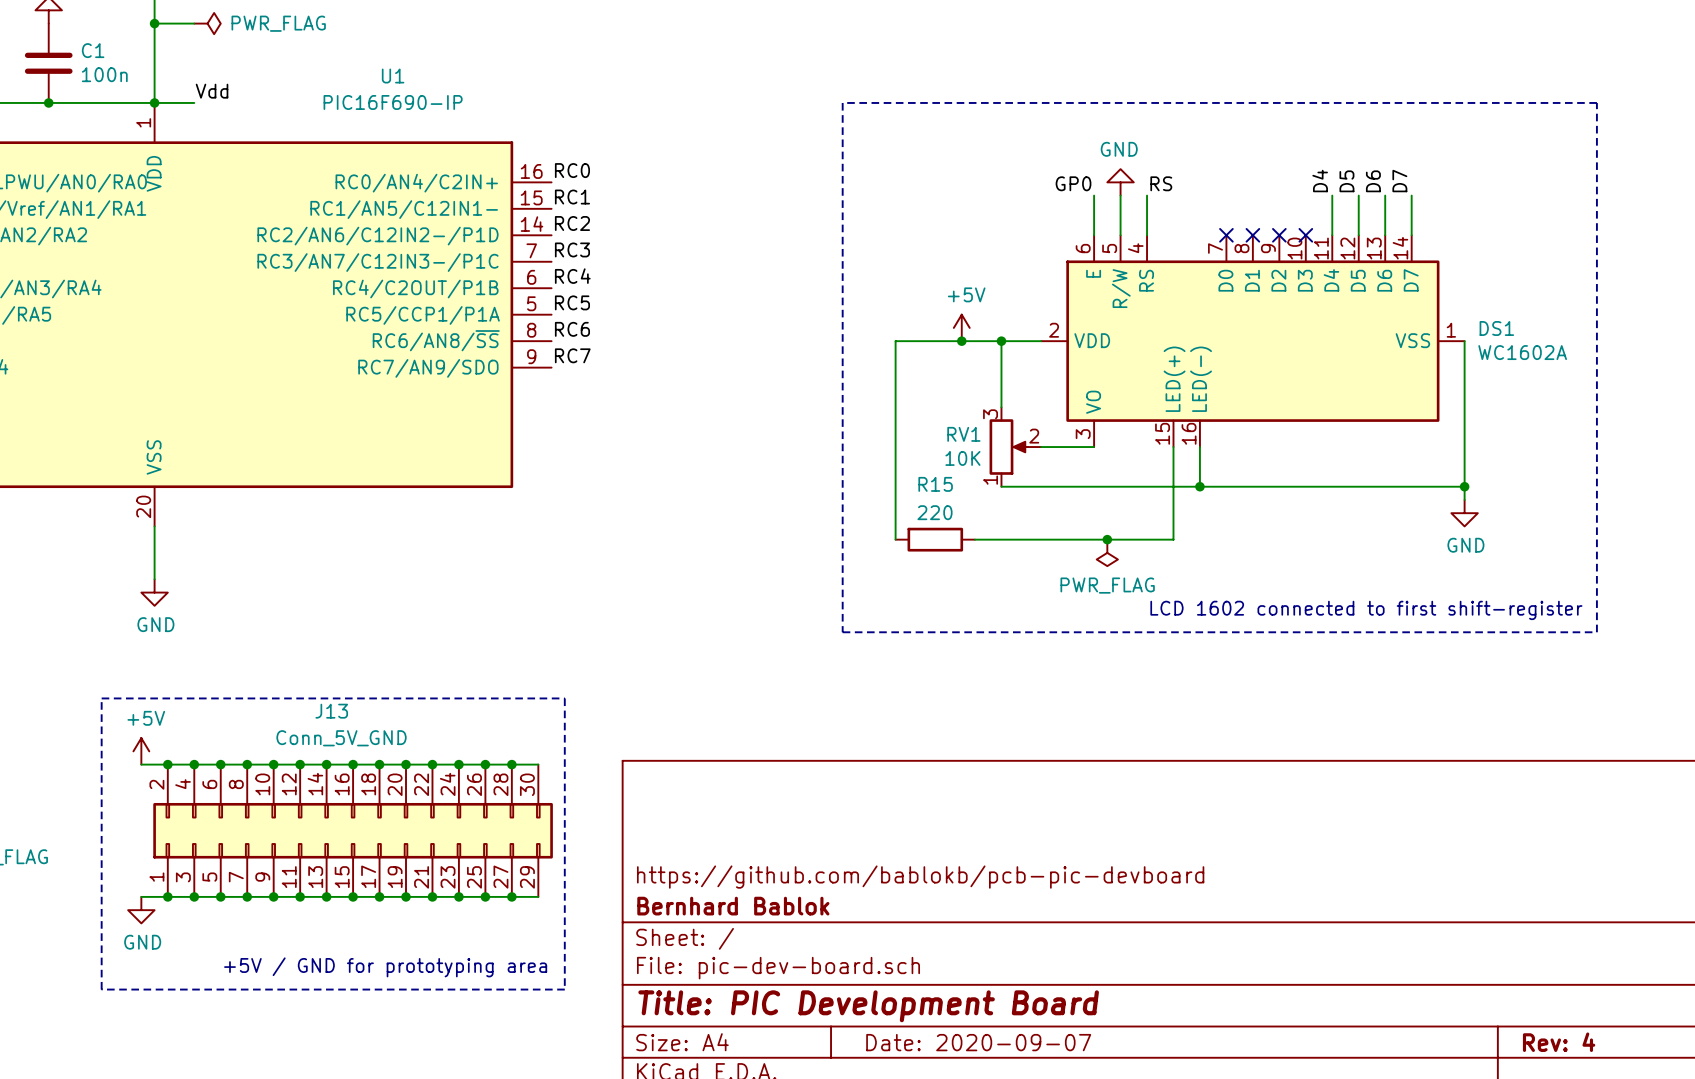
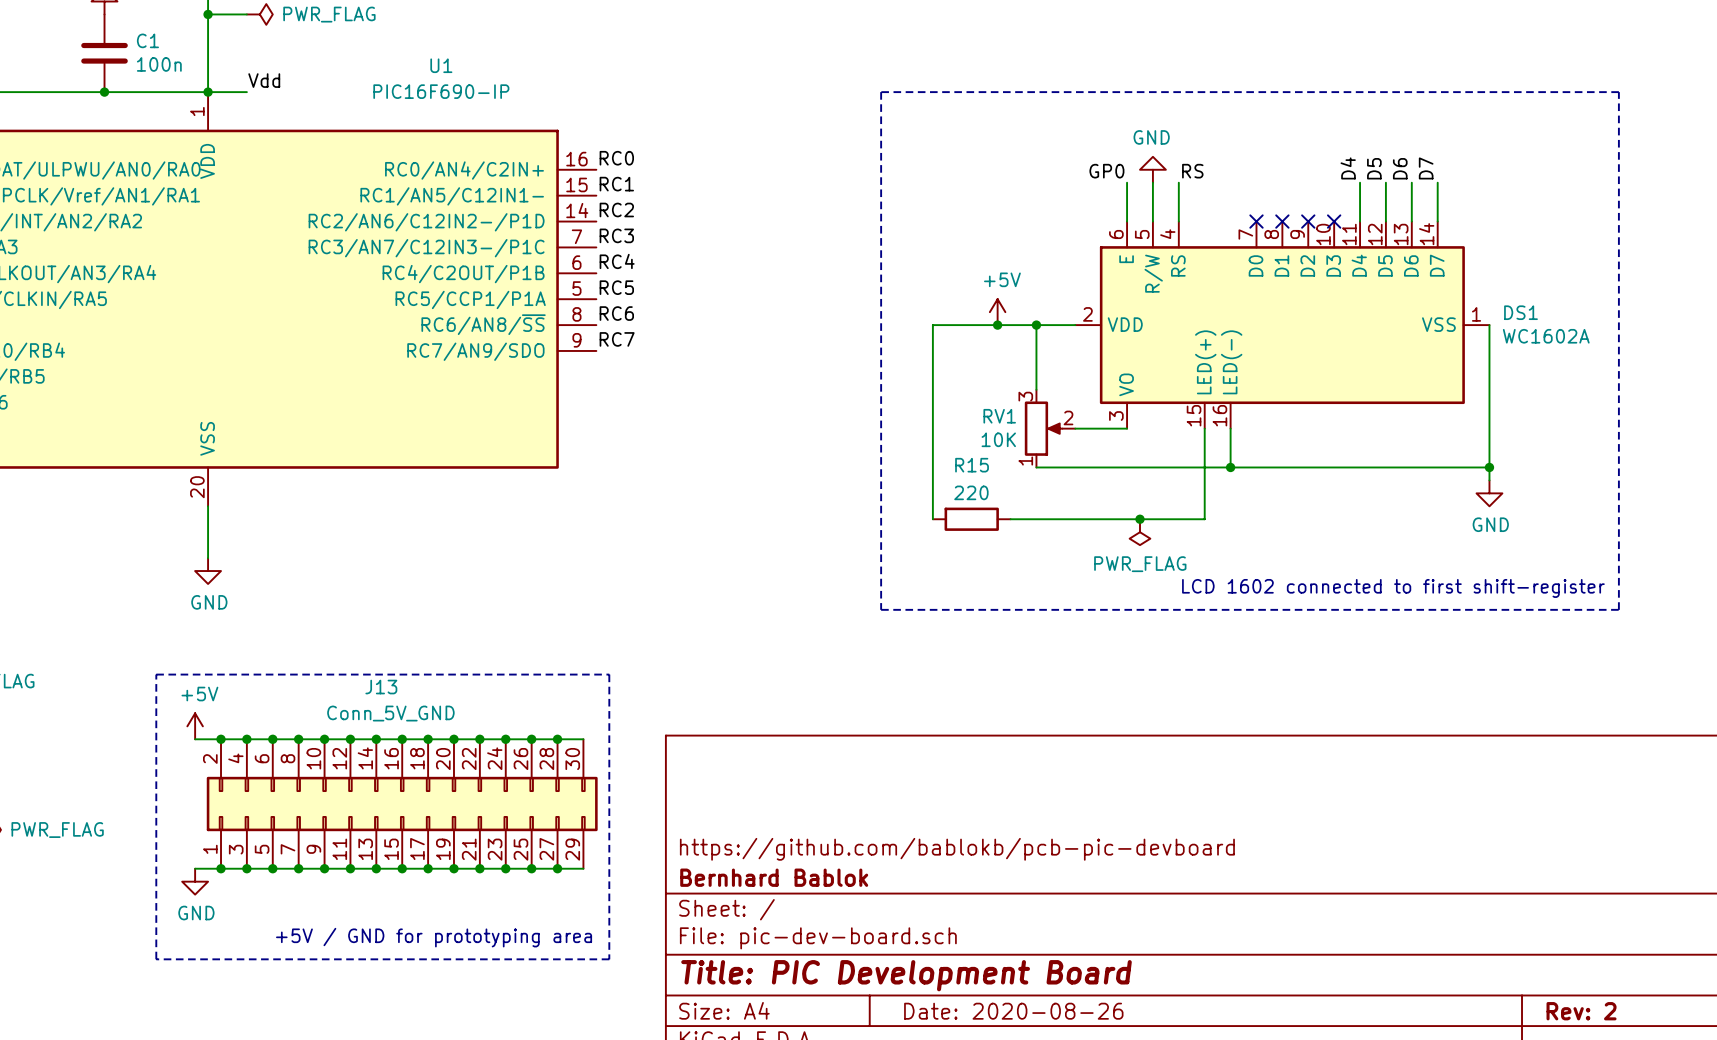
title block: Date: 2020-09-07 (978, 1042) -> Date: 2020-08-26 (1013, 1011)
title block: Rev: 4 (1559, 1042) -> Rev: 2 (1581, 1011)

